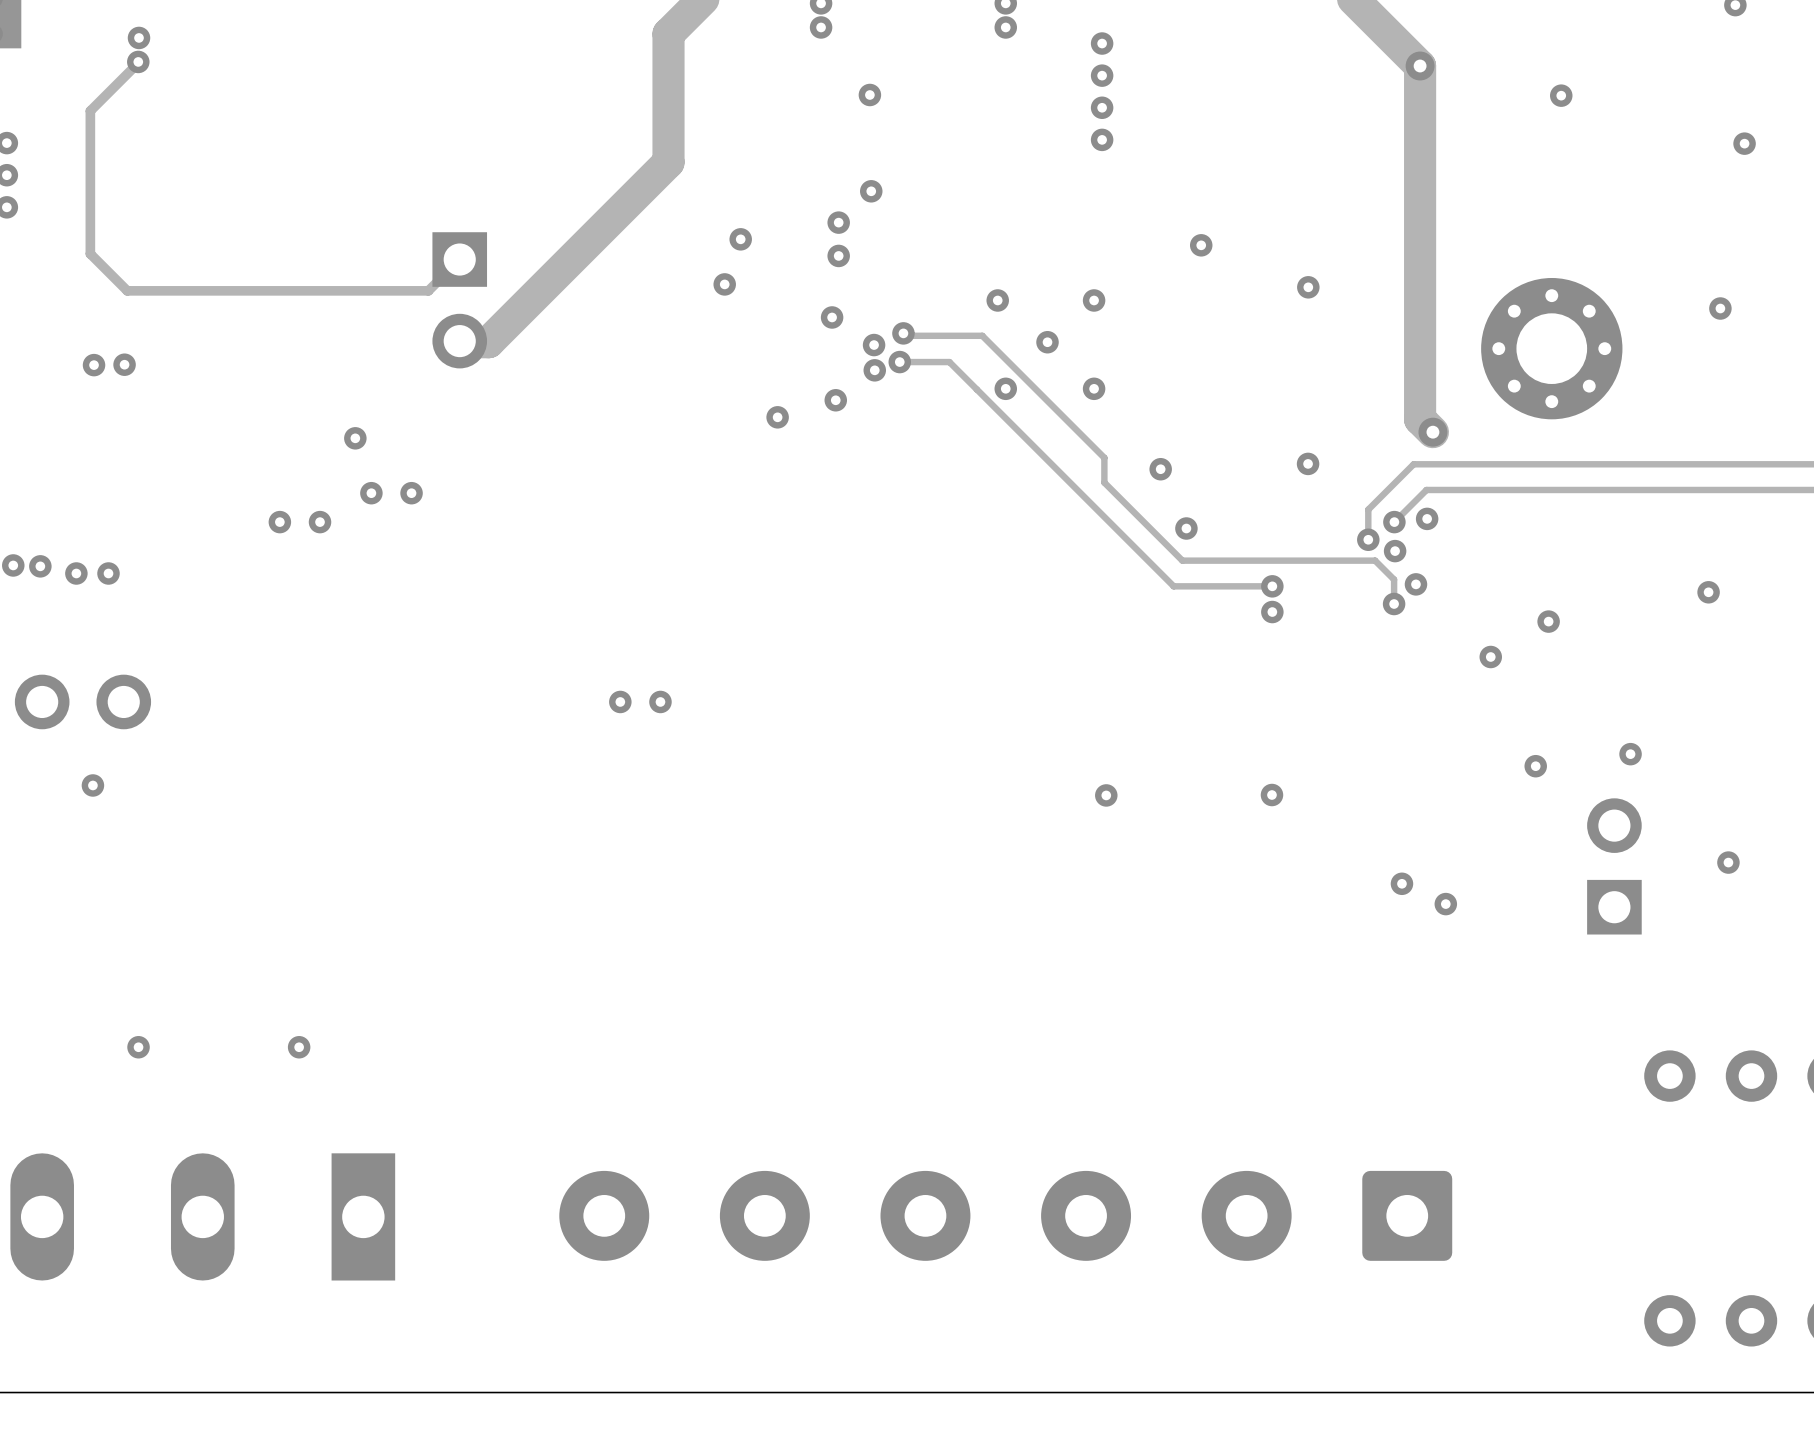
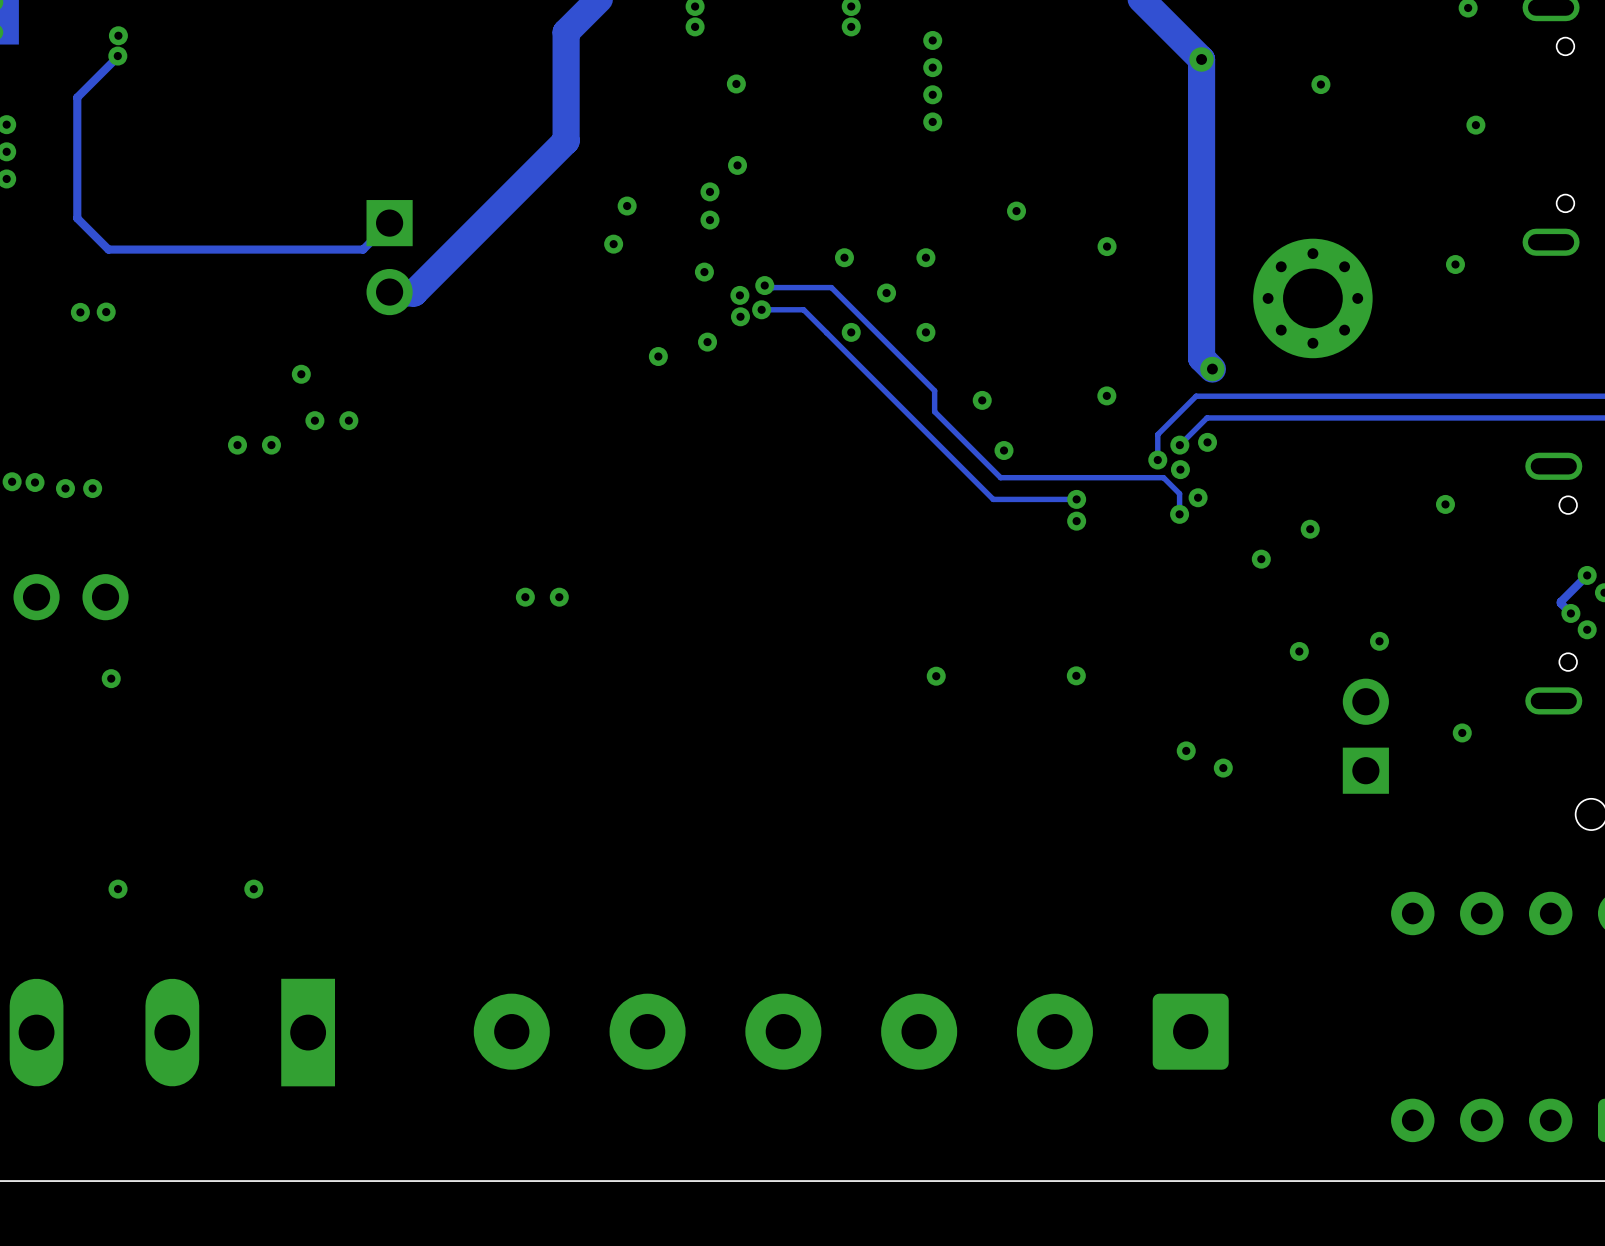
via position: (92, 785) -> (111, 678)

